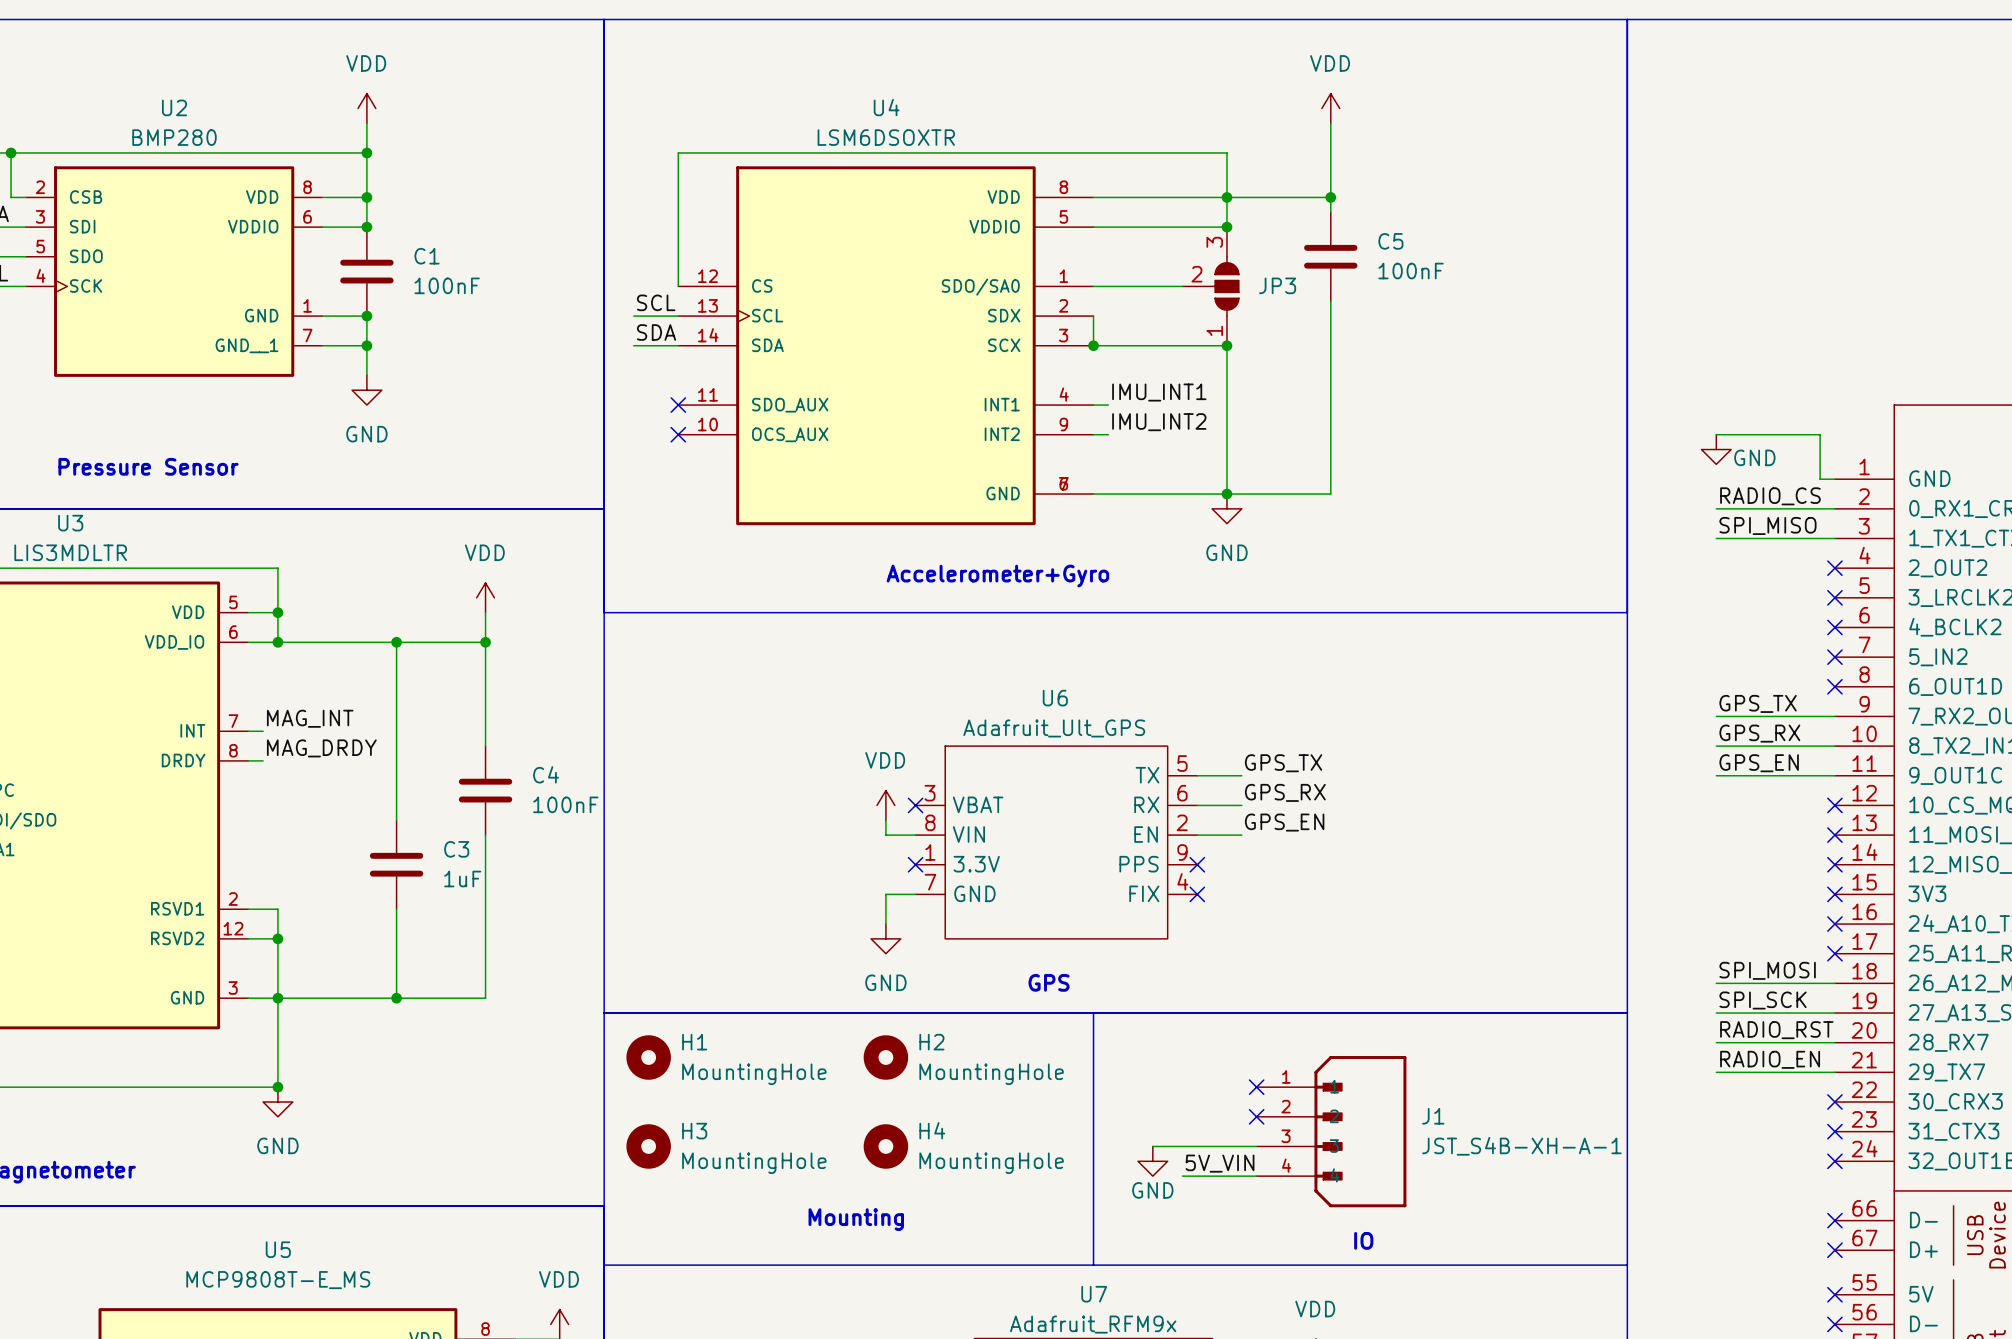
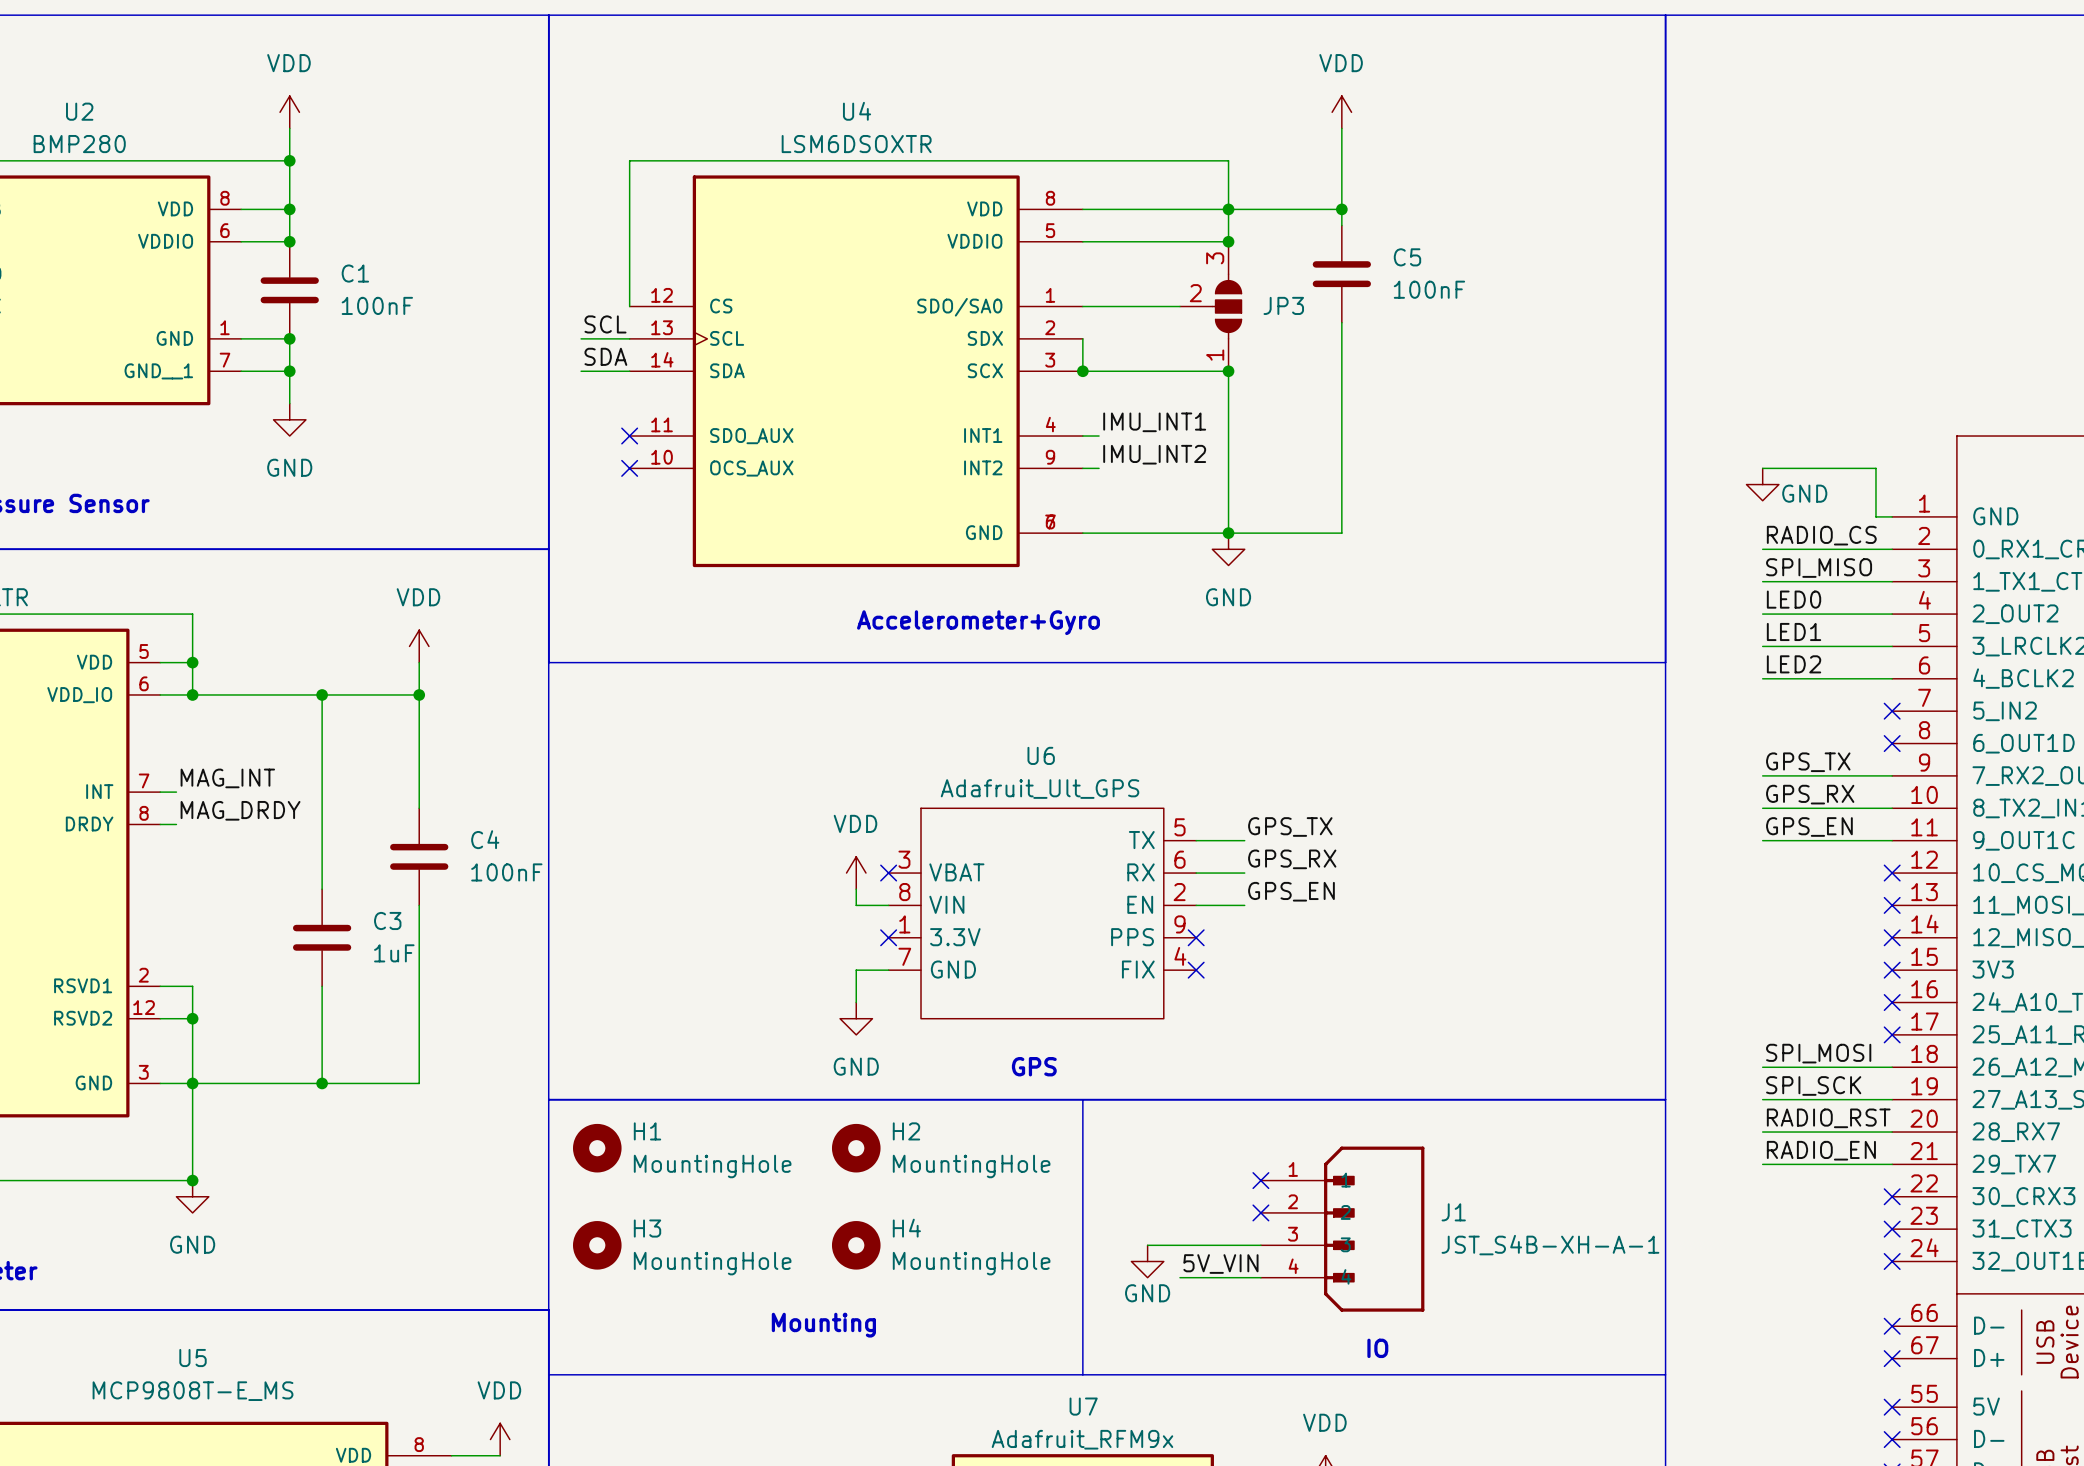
label: none -> LED0 (1794, 599)
wire: none -> (1762, 614) (1892, 614)
no-connect mark: (1834, 568) -> none
label: none -> LED1 (1794, 631)
wire: none -> (1762, 646) (1892, 646)
no-connect mark: (1834, 597) -> none
label: none -> LED2 (1794, 664)
wire: none -> (1762, 678) (1892, 678)
no-connect mark: (1834, 627) -> none

